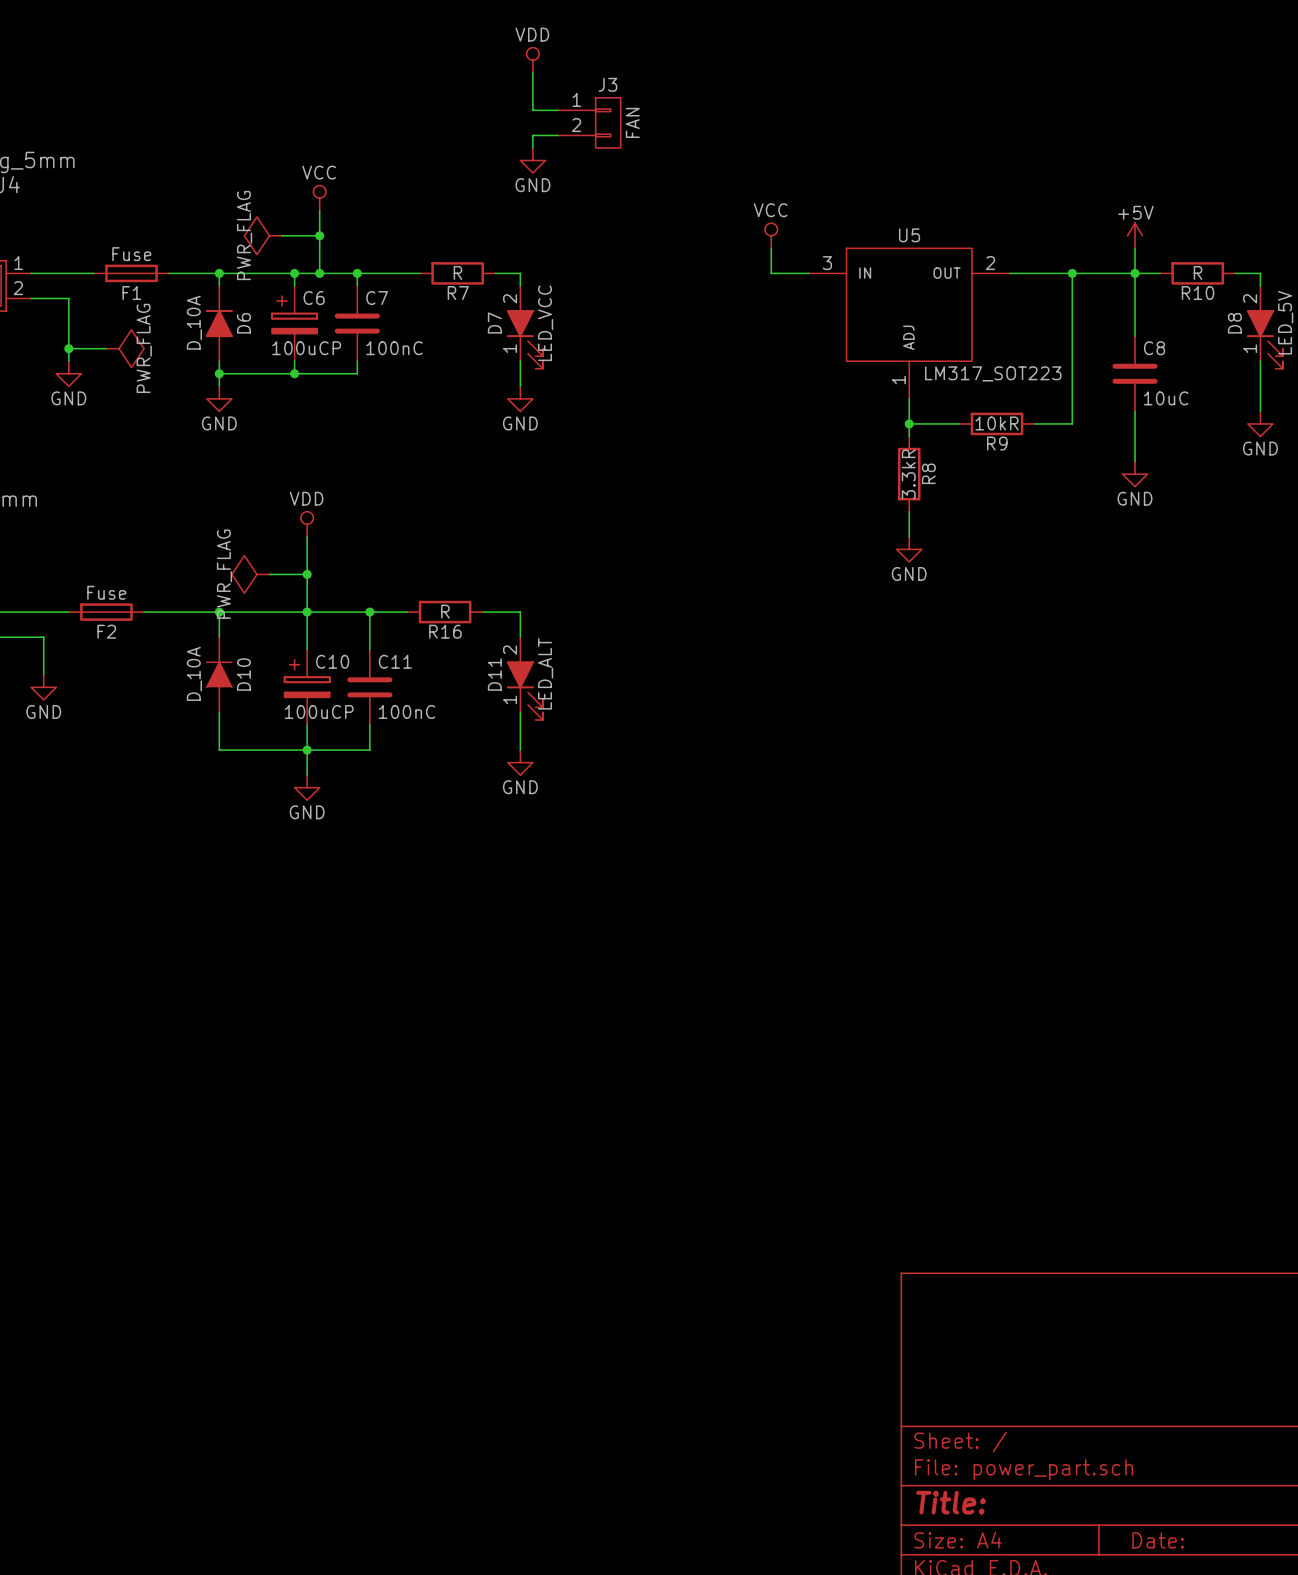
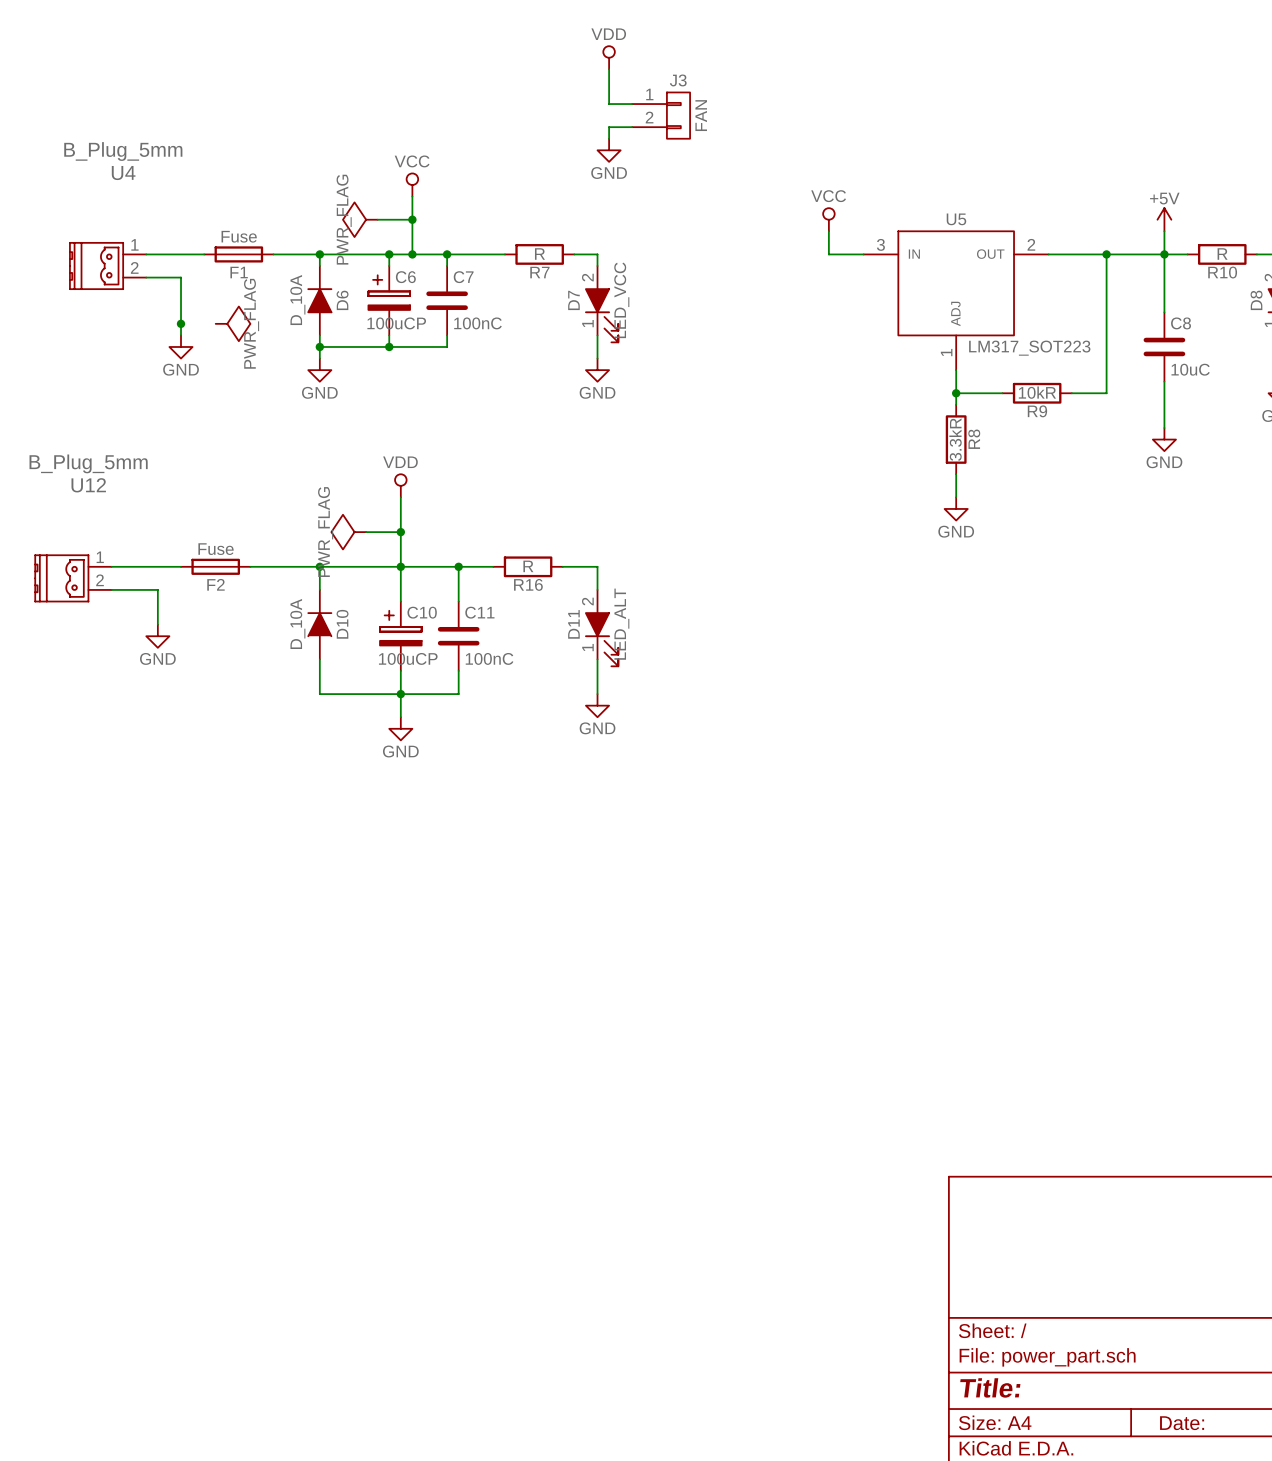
wire: (68, 348) (106, 348) -> none

